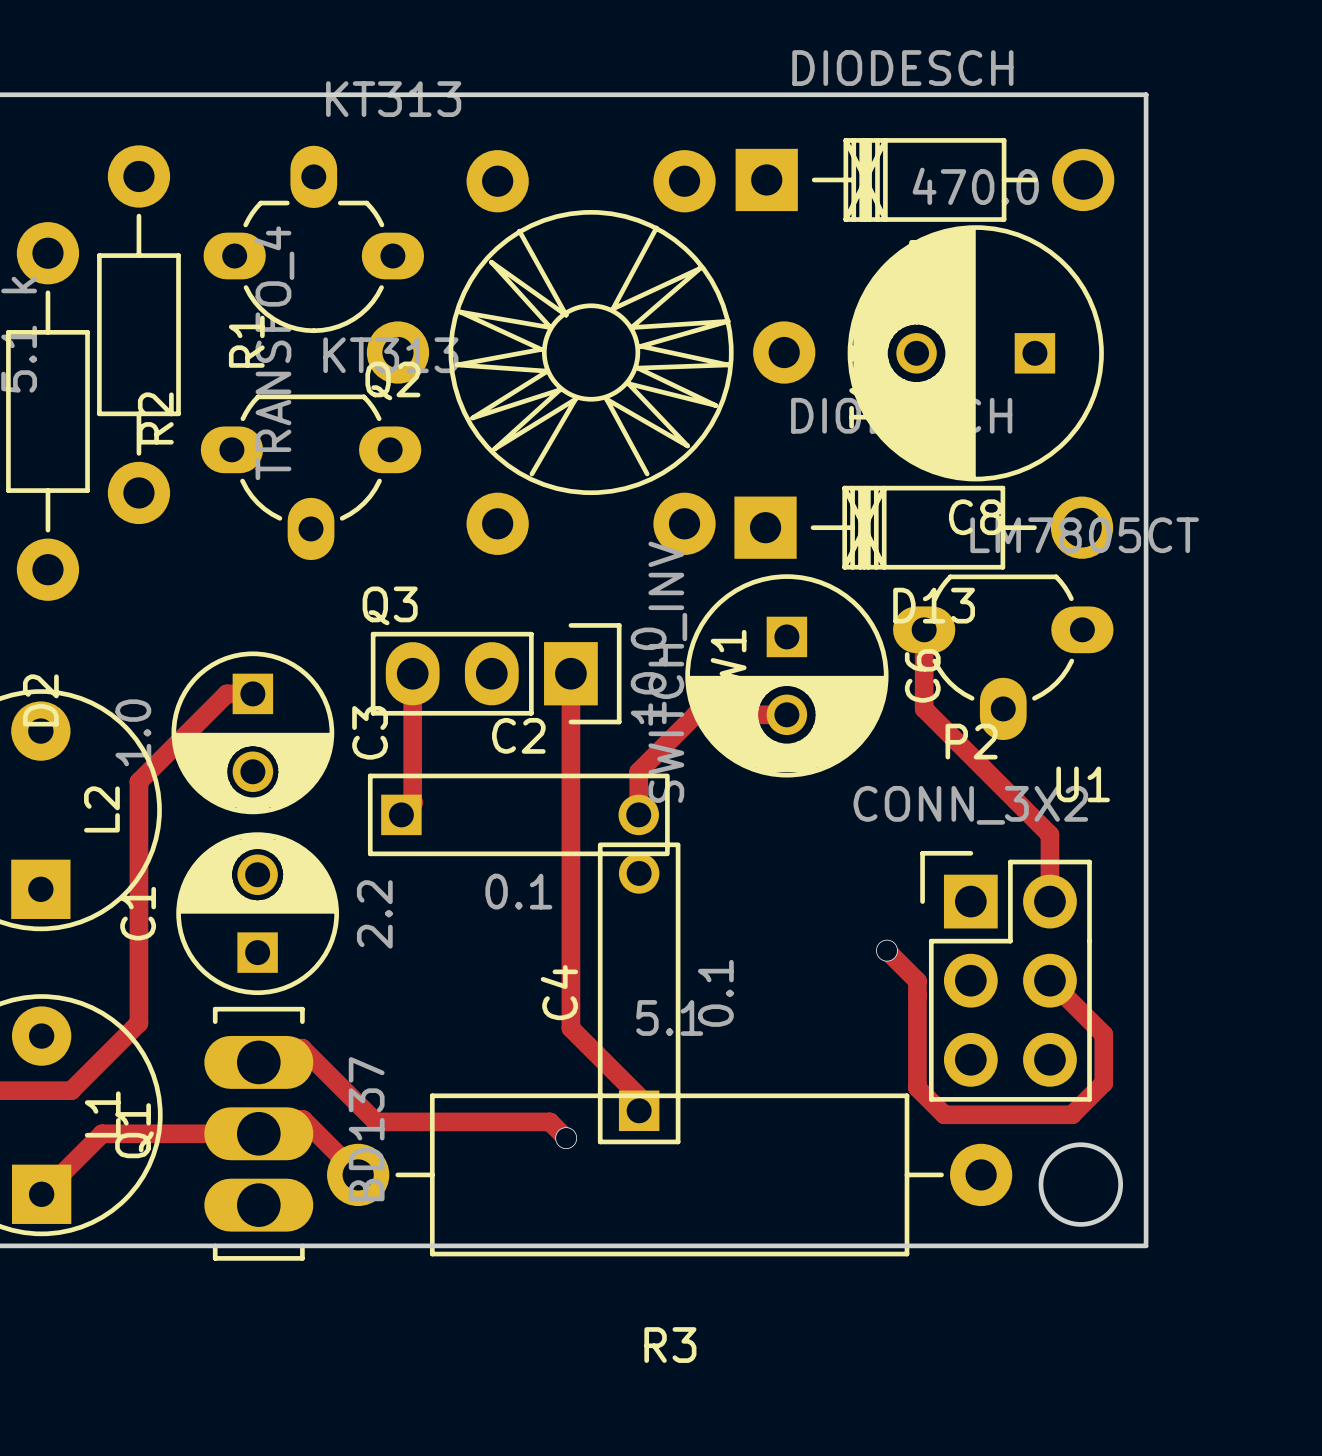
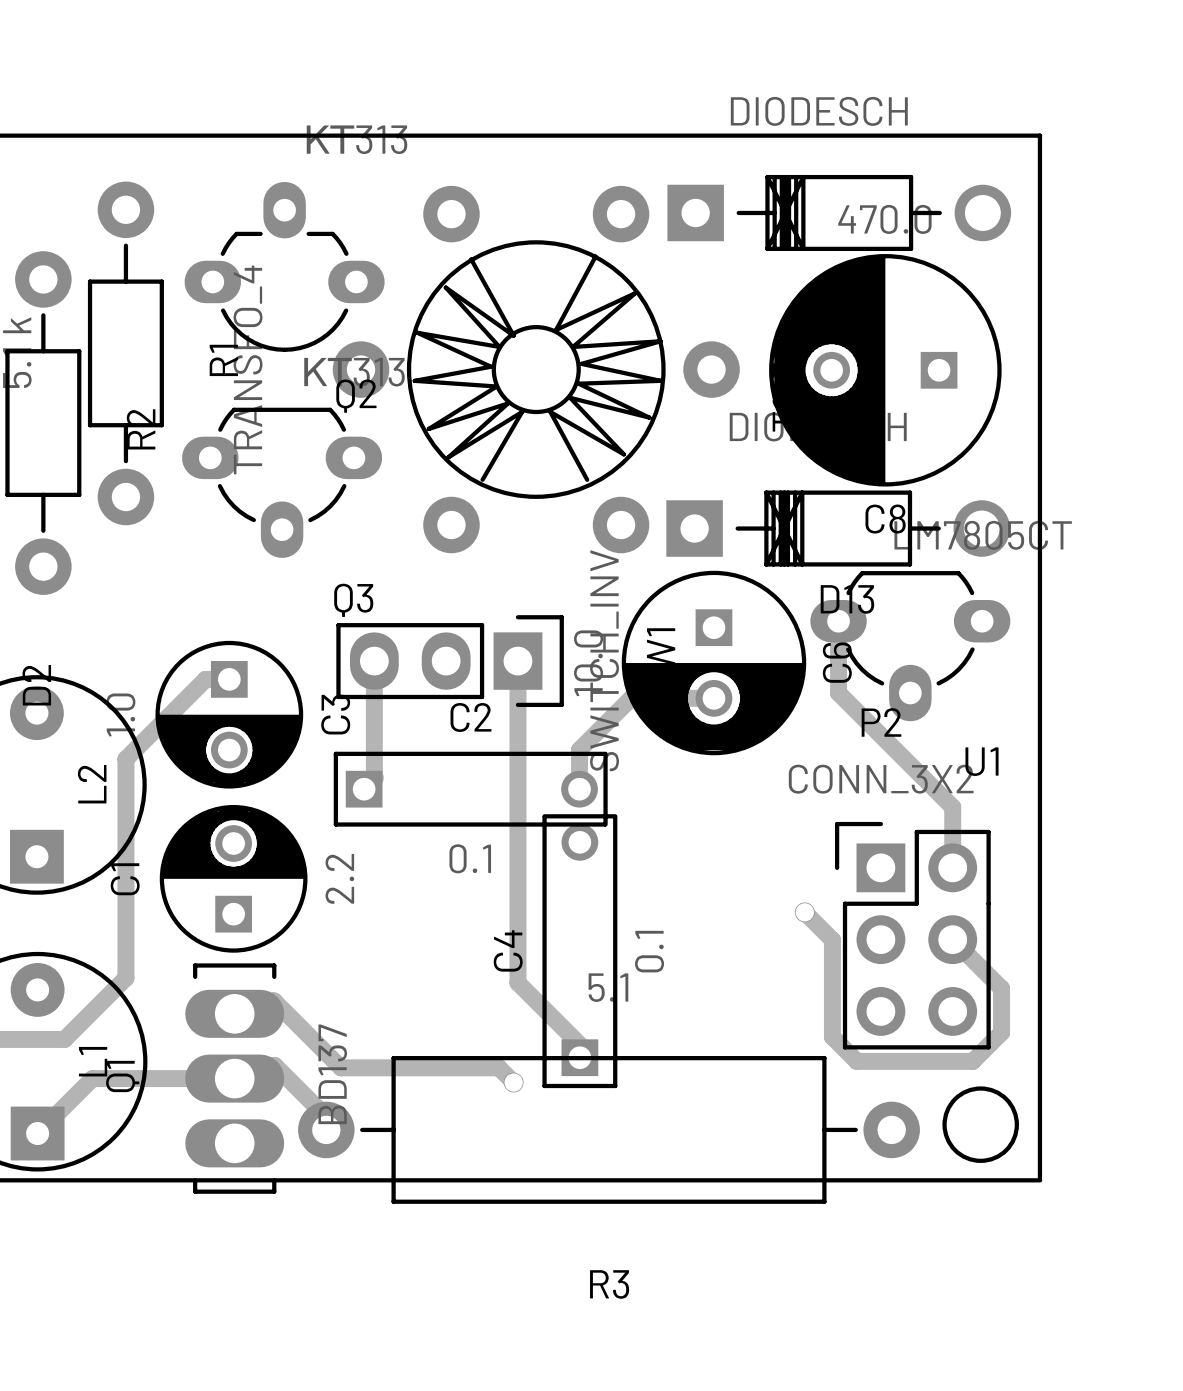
R3 position: (669, 1174) -> (609, 1129)

